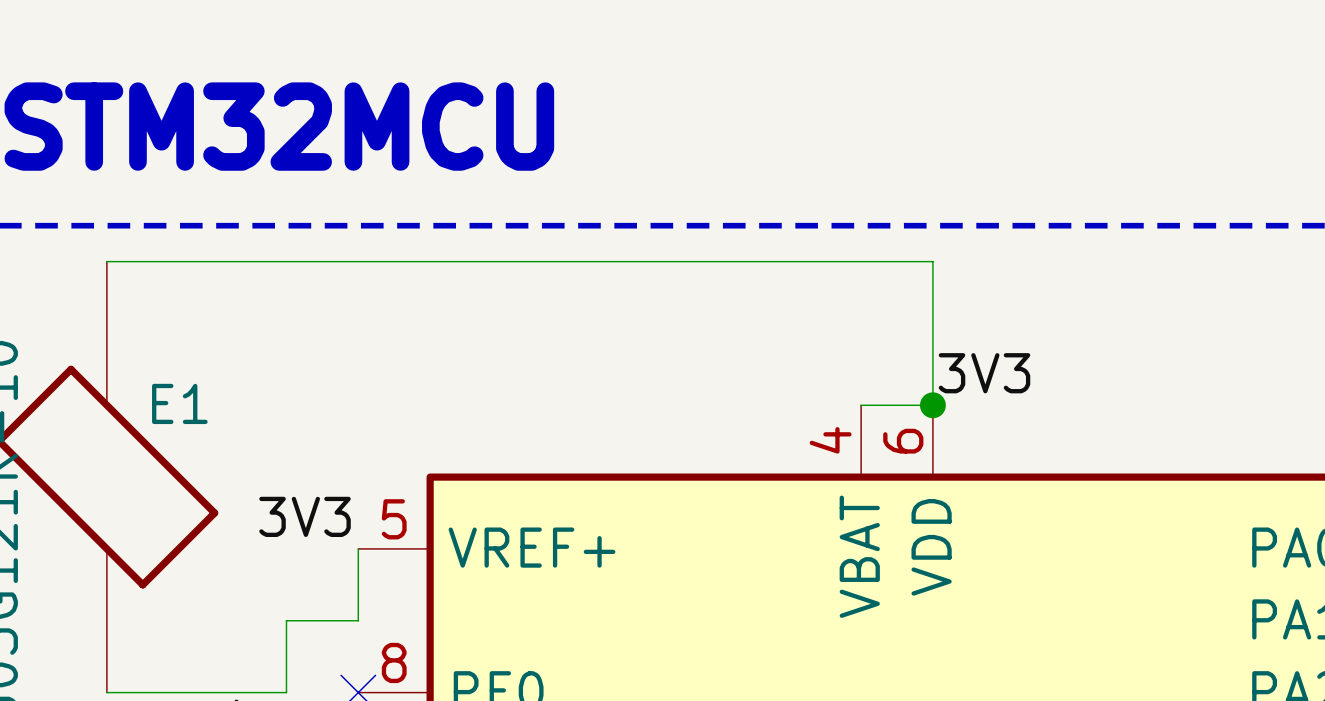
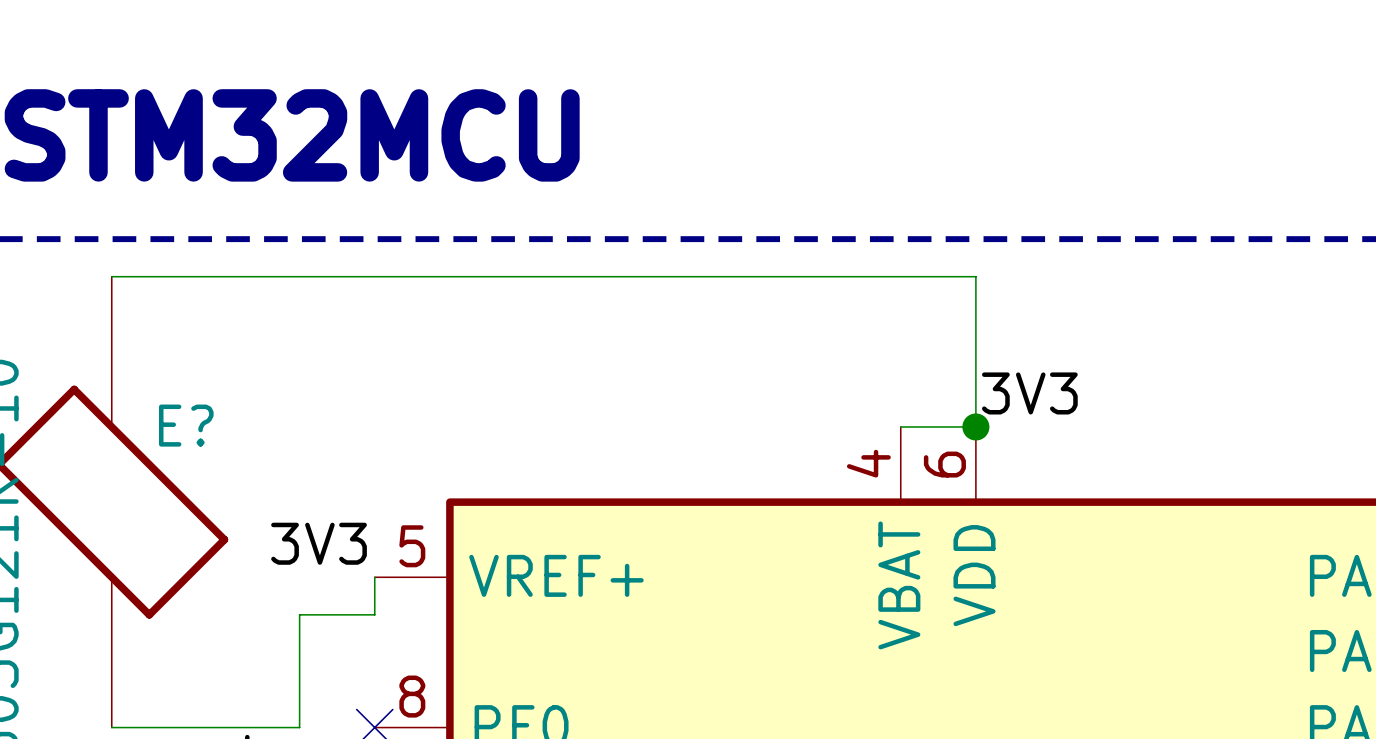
E1 name: E1 (179, 403) -> E? (186, 425)
wire: (358, 584) (358, 620) (286, 620) -> (374, 614) (299, 614) (299, 652)

